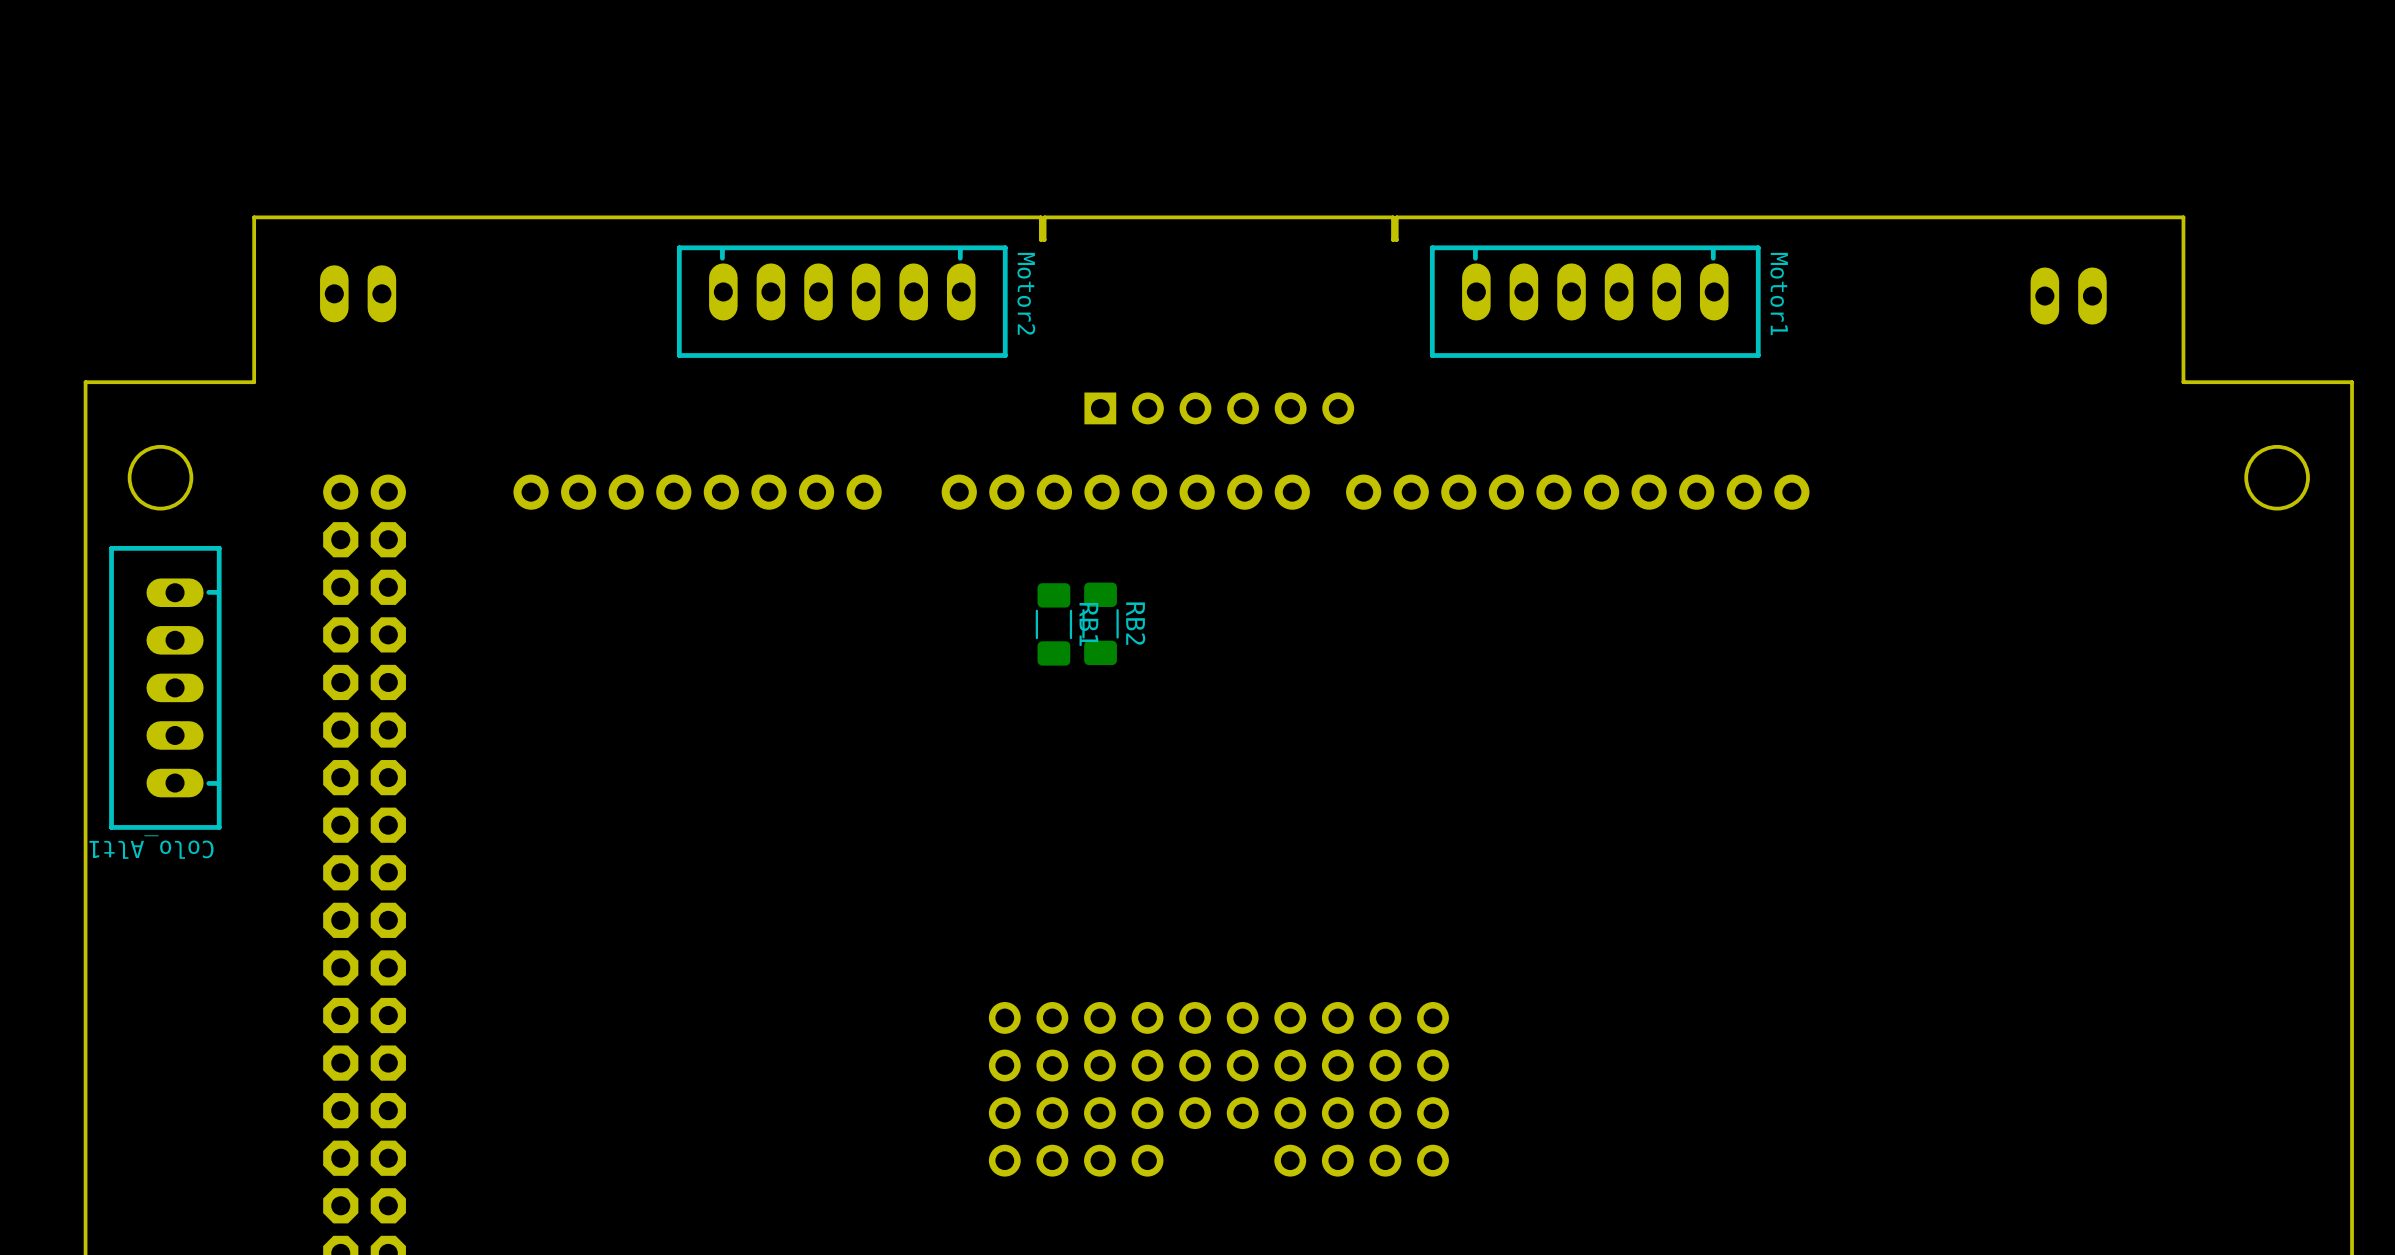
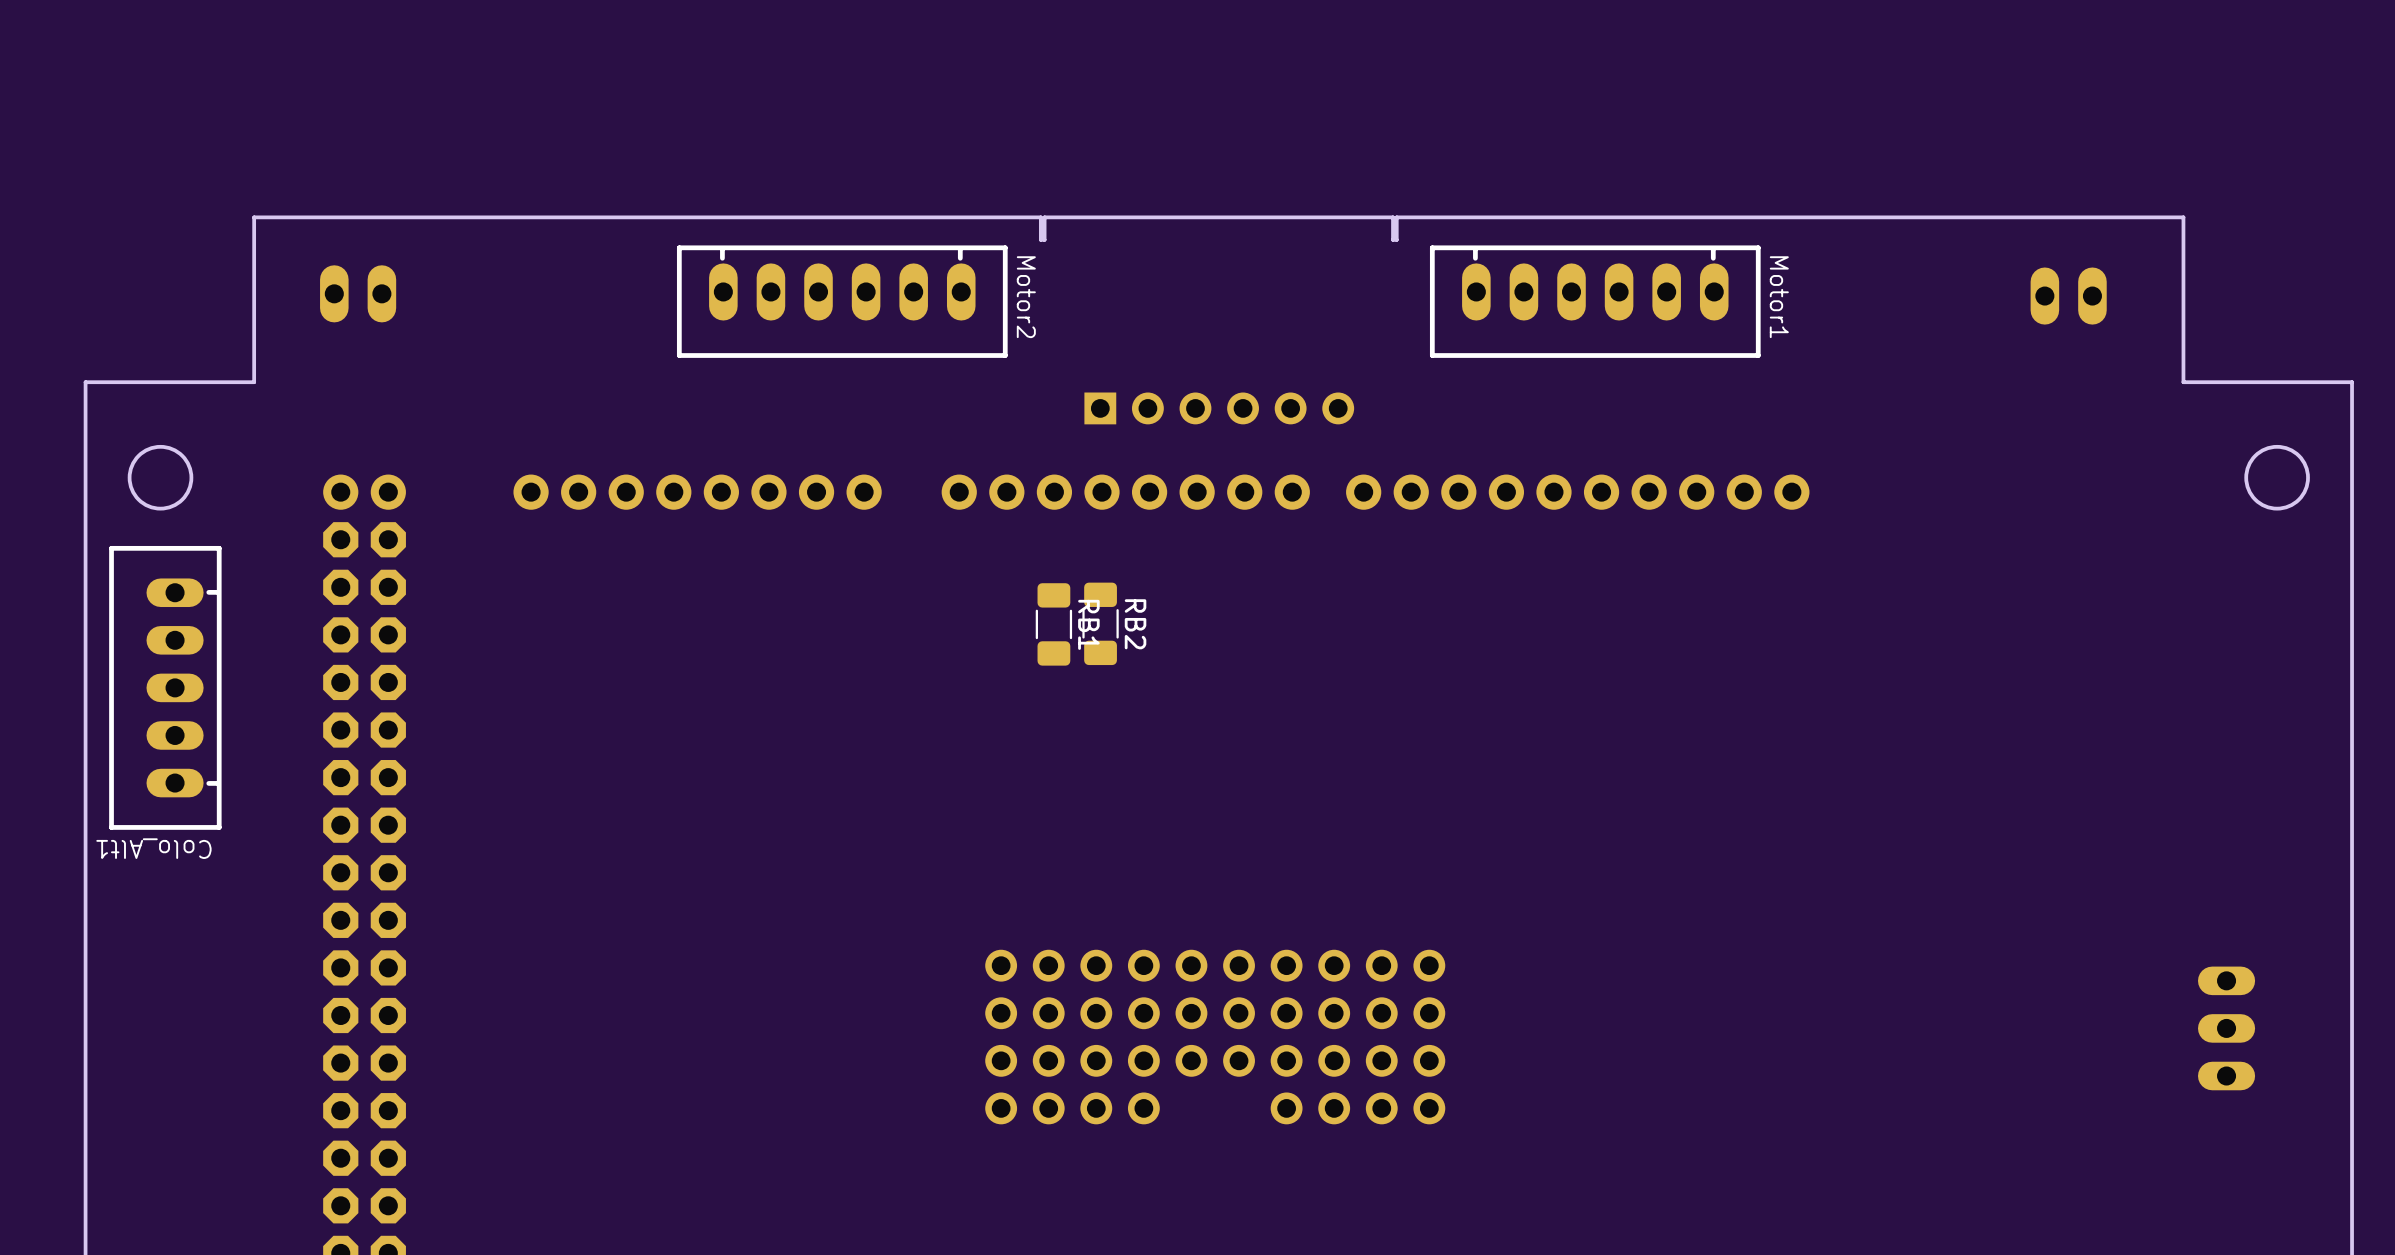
part: none -> (2226, 1028)
part position: (1218, 1089) -> (1215, 1037)

